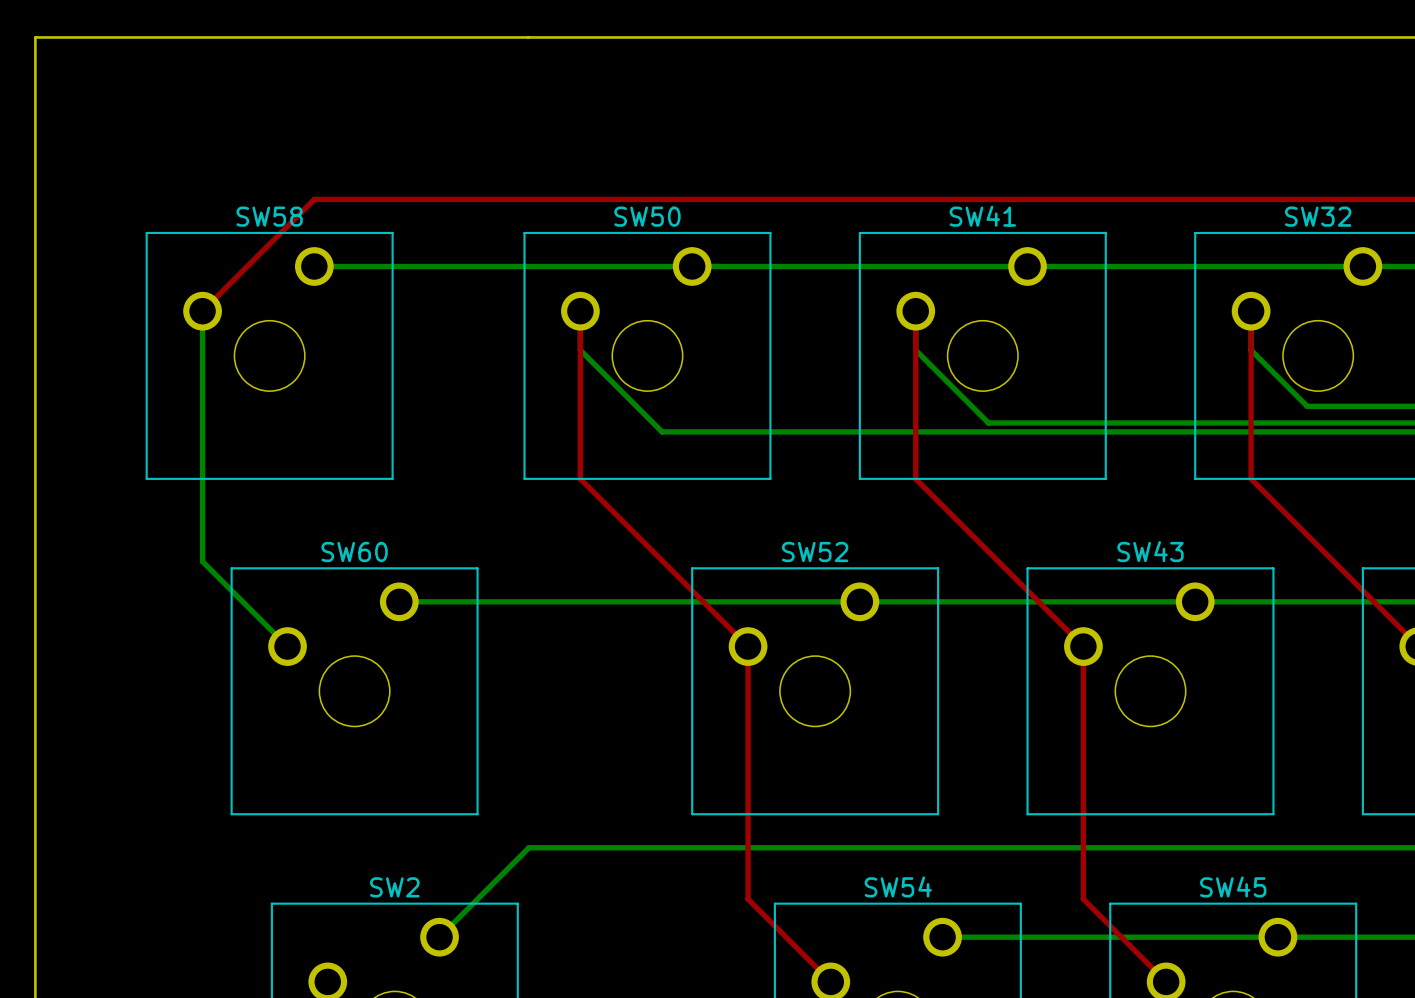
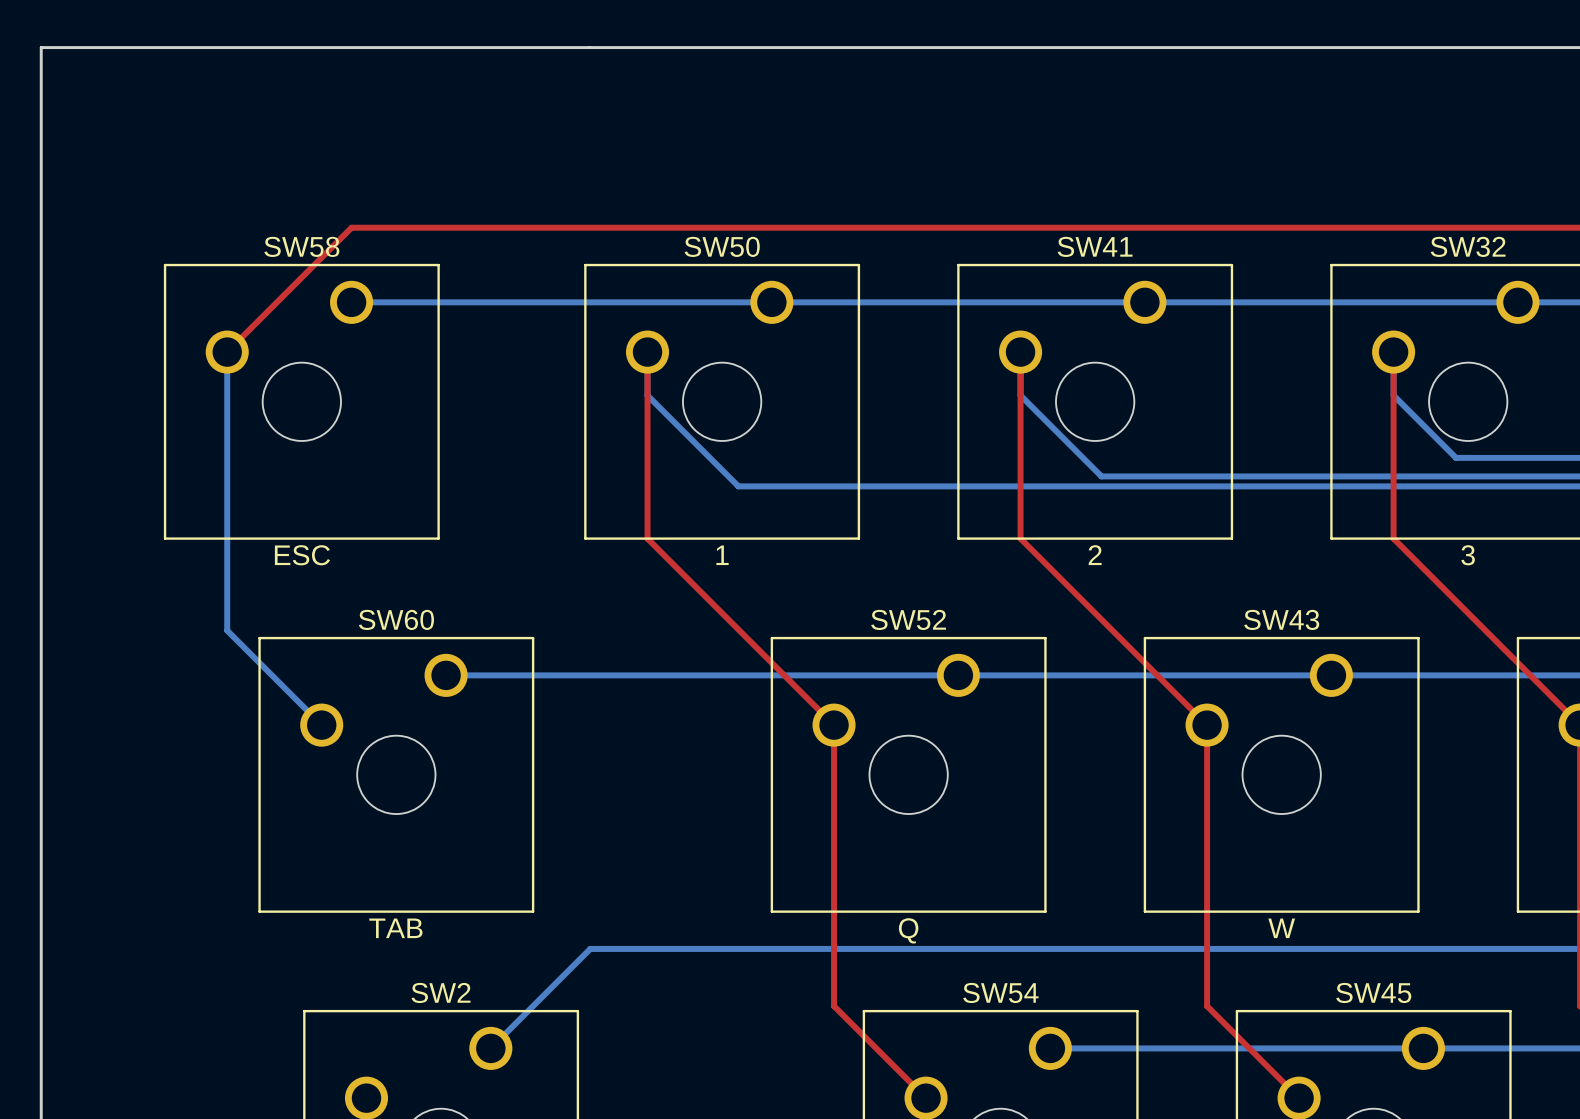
SW58 value: none -> ESC (302, 555)
SW50 value: none -> 1 (722, 555)
SW41 value: none -> 2 (1095, 555)
SW32 value: none -> 3 (1468, 555)
SW60 value: none -> TAB (395, 928)
SW43 value: none -> W (1281, 928)
SW52 value: none -> Q (908, 930)

